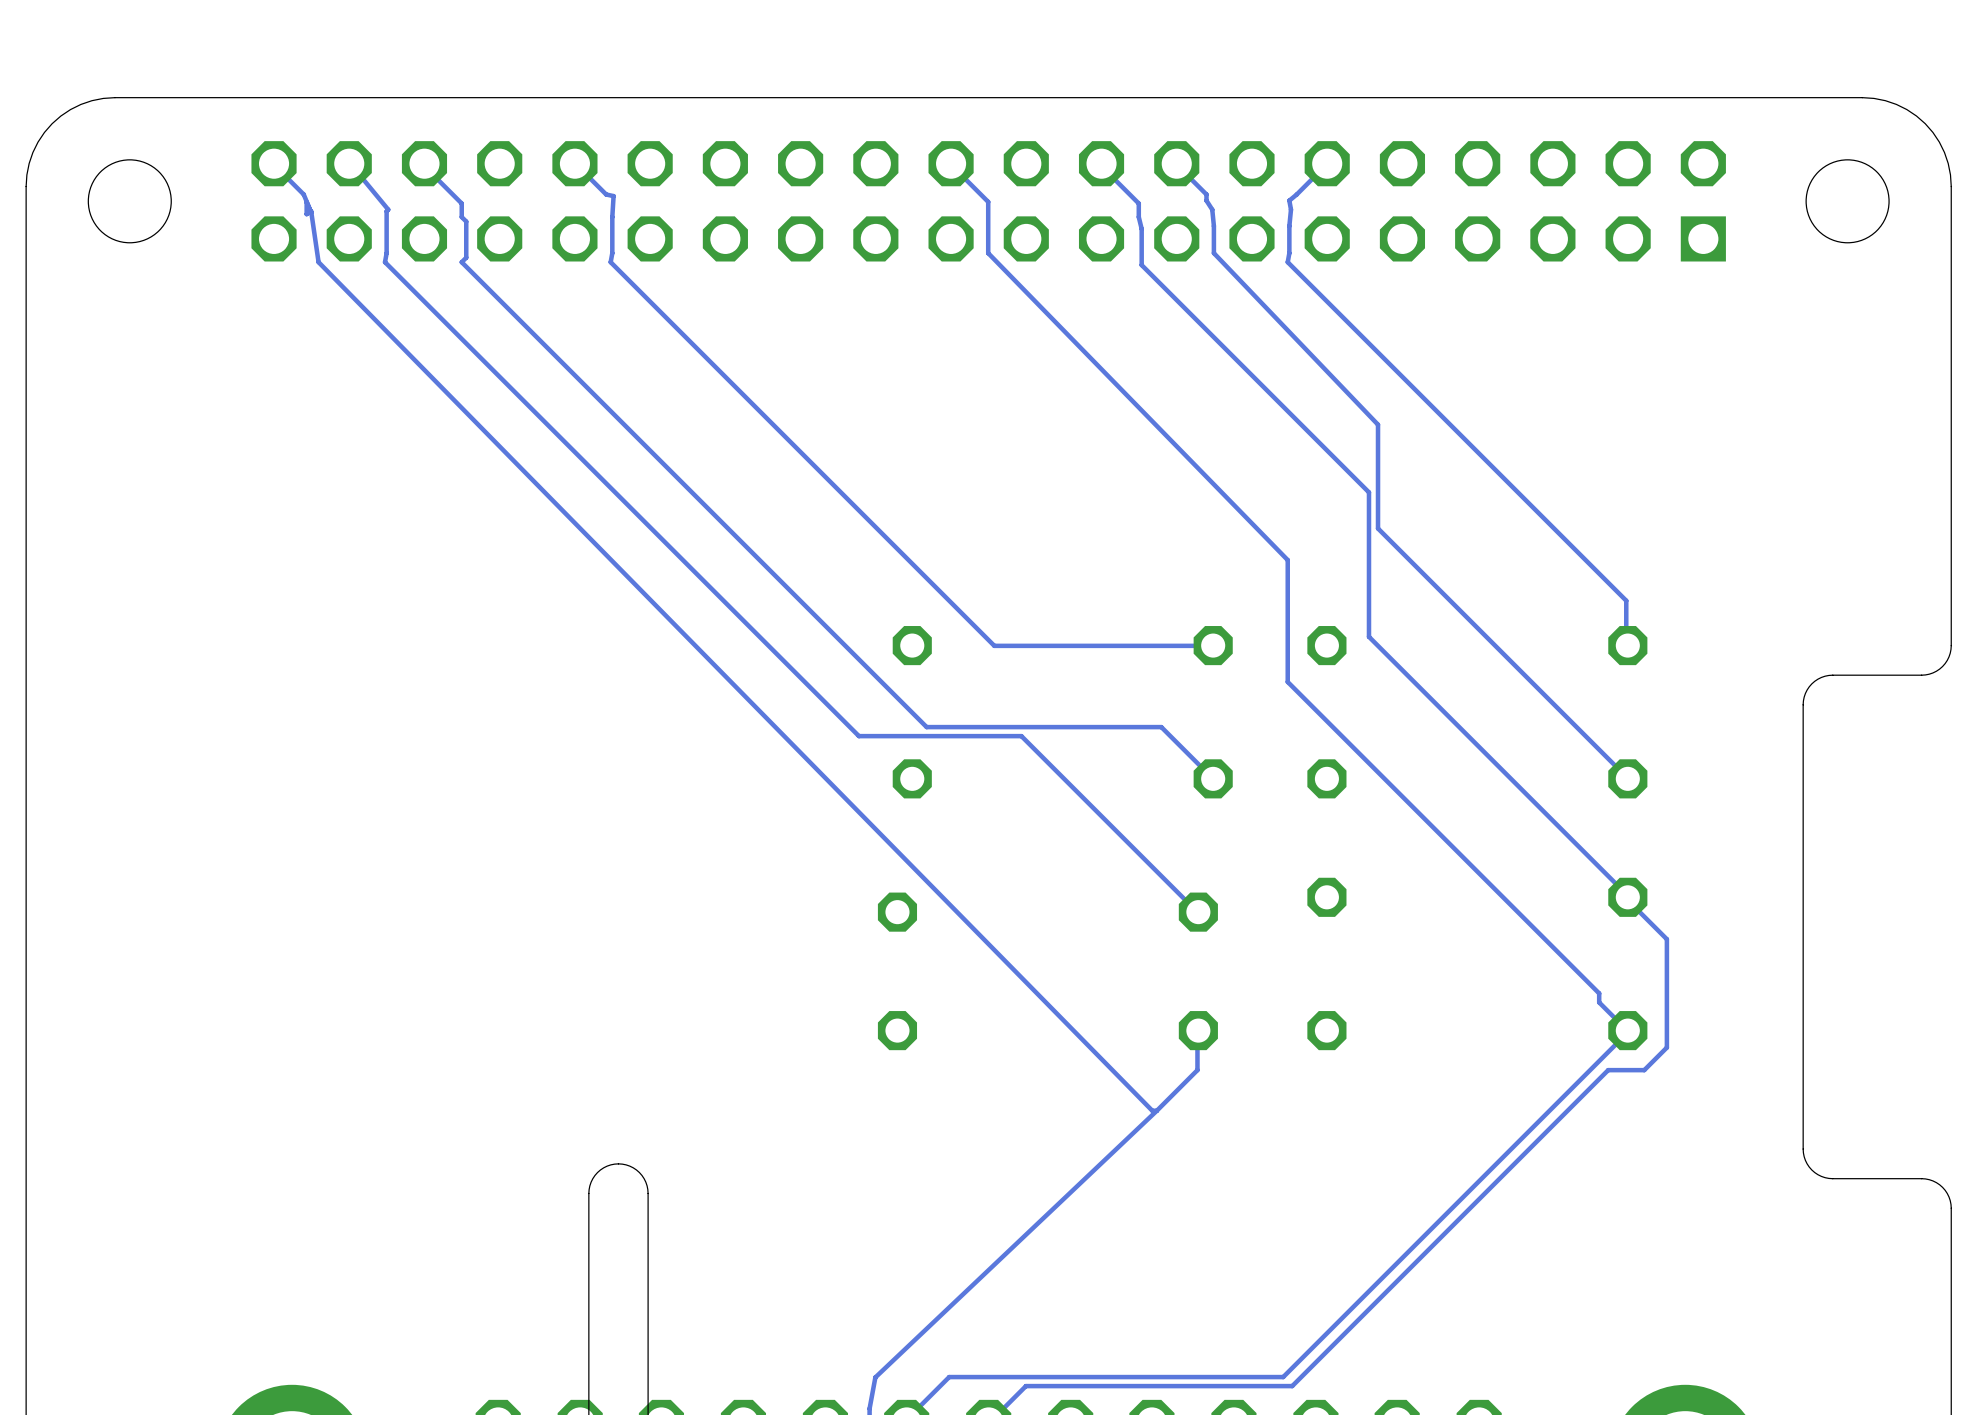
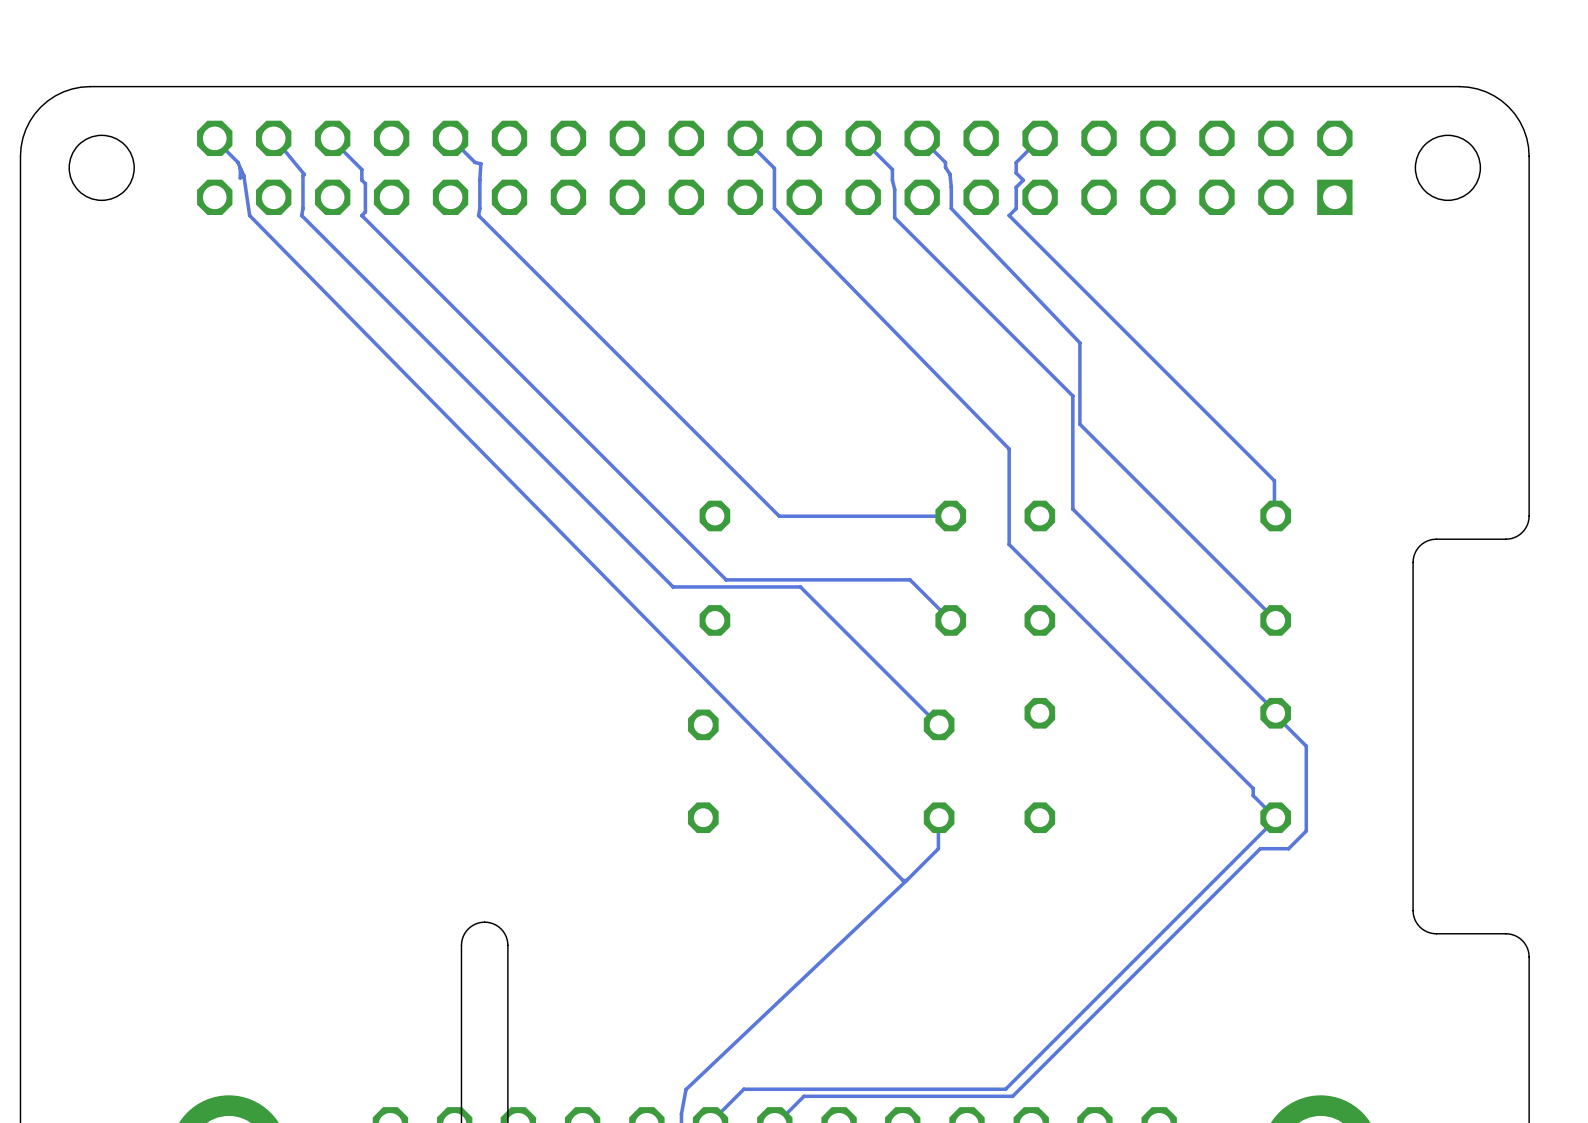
track: (1296, 194) (1289, 200) (1290, 209) (1287, 262) -> (1016, 162) (1016, 173) (1023, 180) (1016, 187) (1016, 208) (1009, 215)

